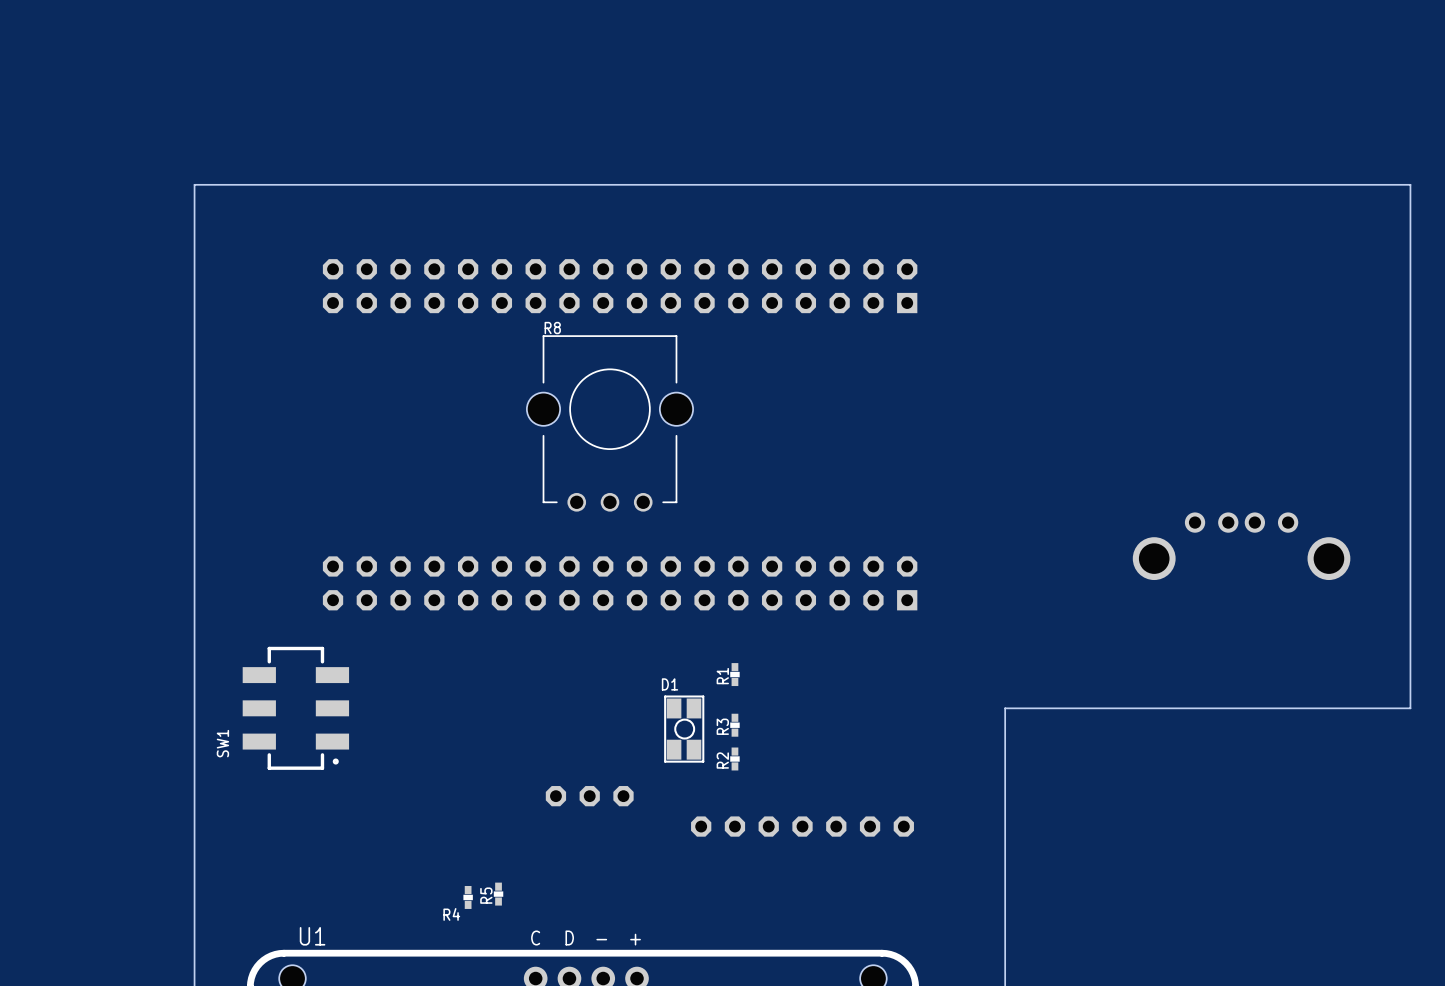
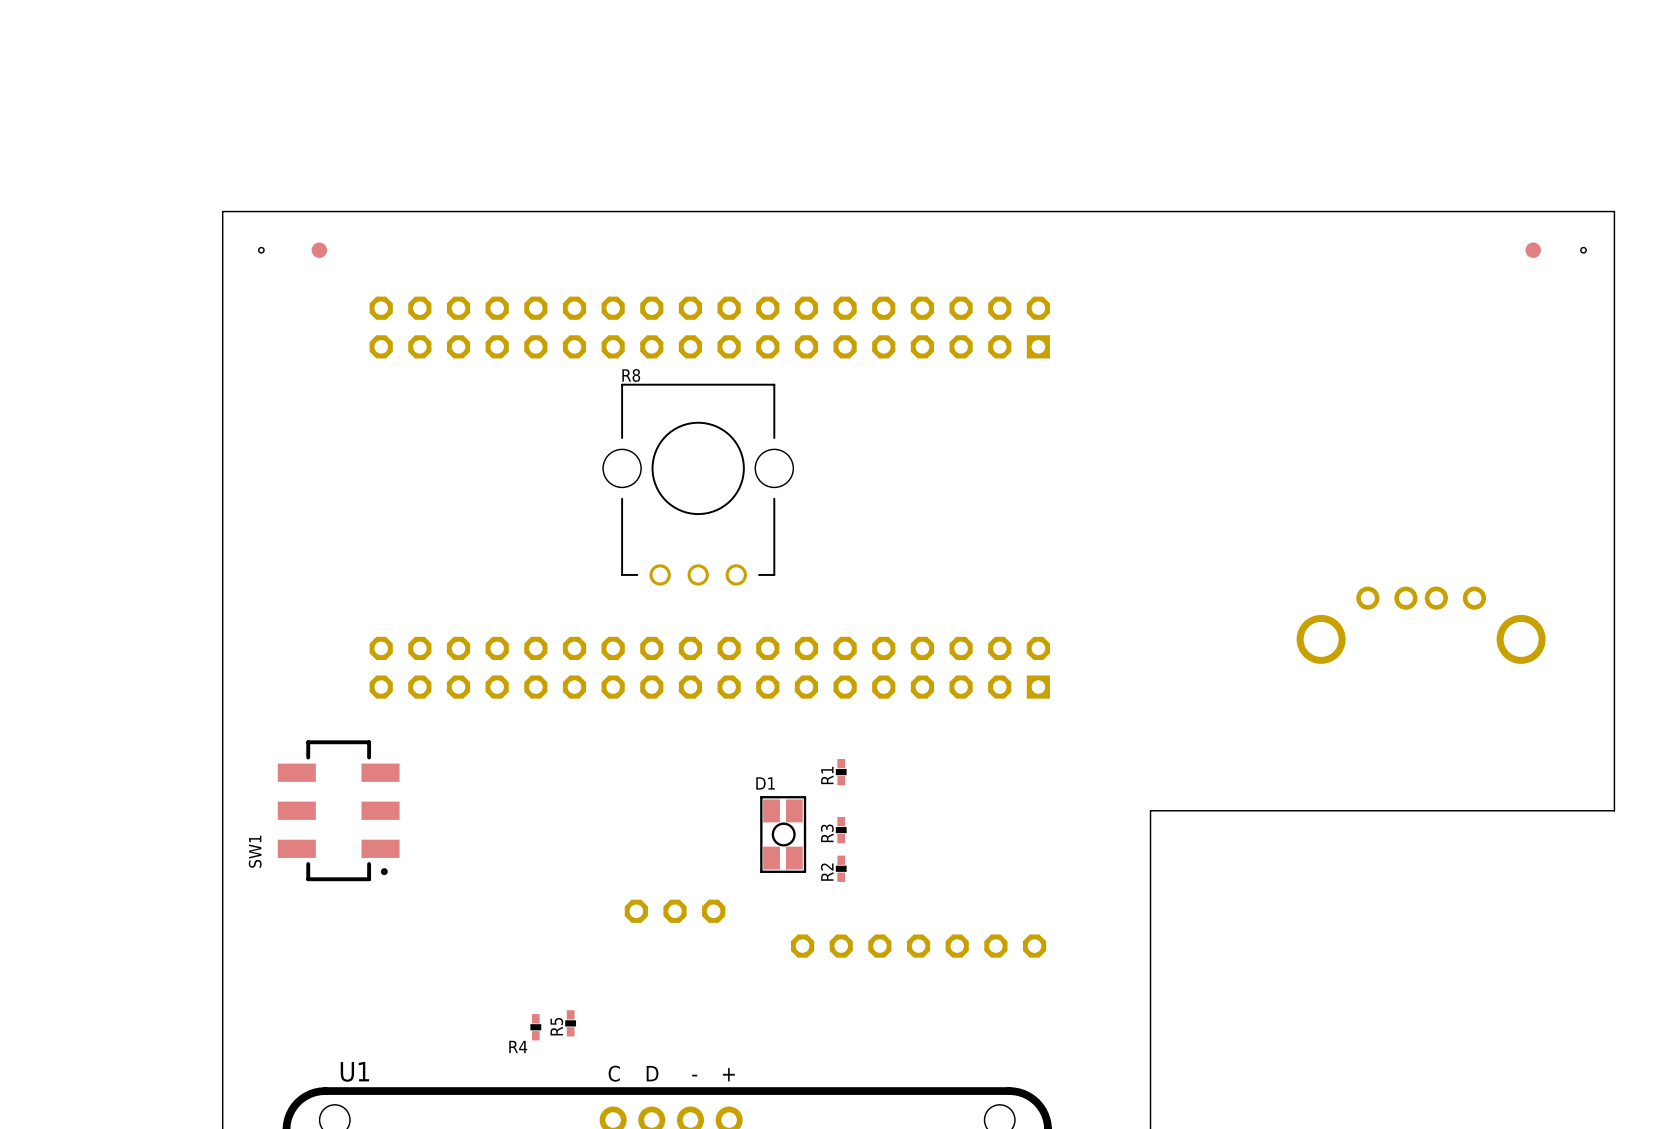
hole: none -> (261, 250)
part: none -> (319, 250)
part: none -> (1533, 250)
hole: none -> (1583, 250)

